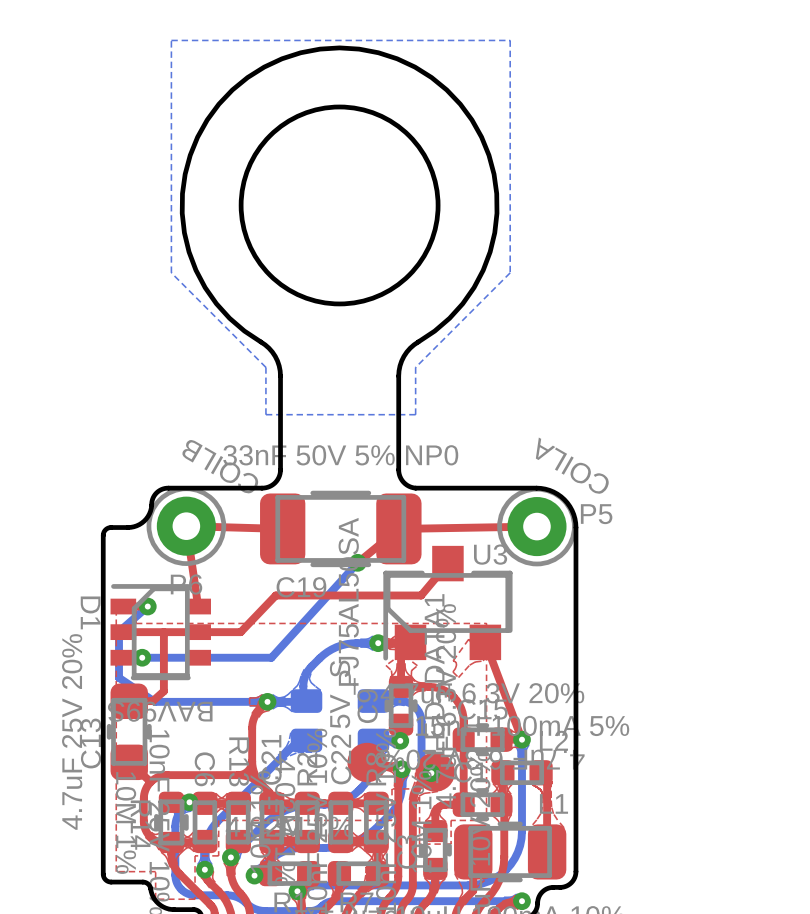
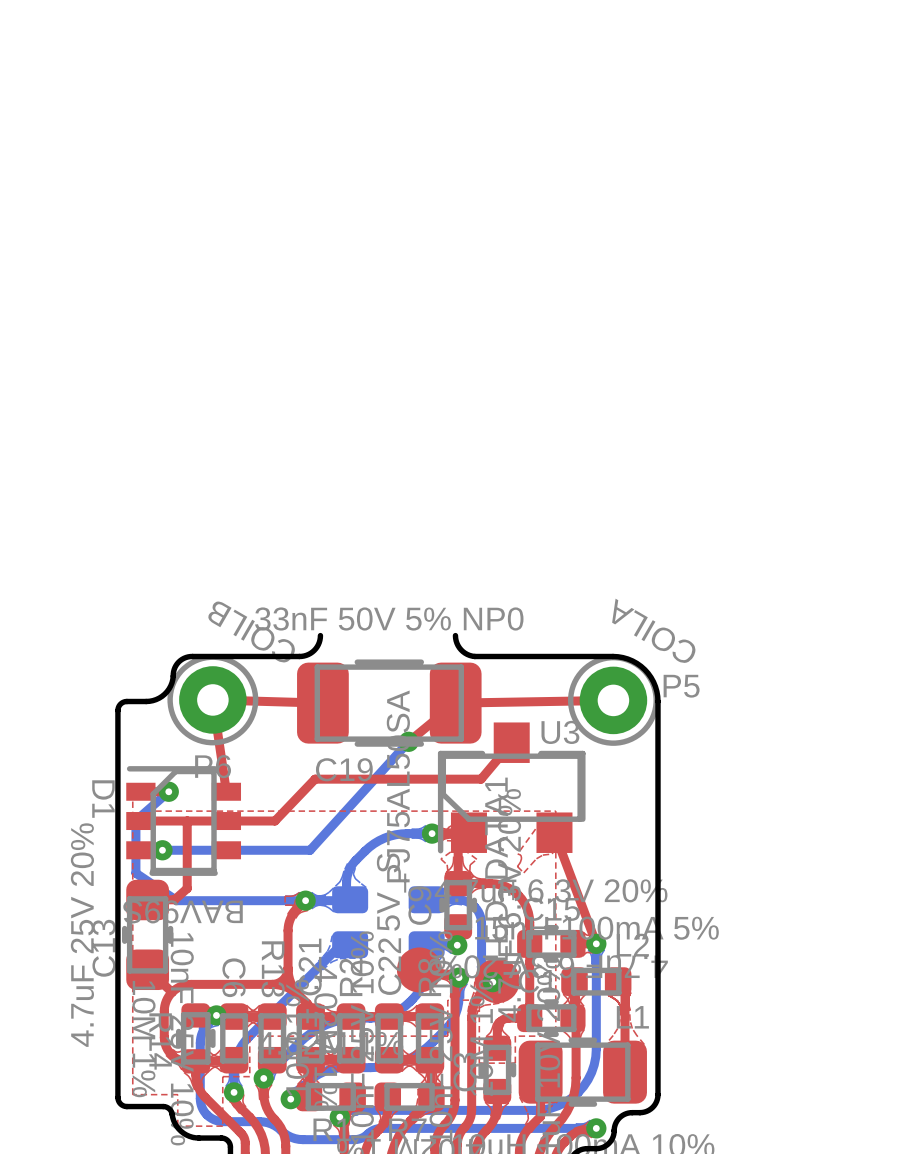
bottom zone outline: (171, 40) (171, 272) (265, 367) (265, 414) (415, 414) (415, 367) (510, 272) (510, 40) (171, 40) -> none
round board edge: [238, 104, 441, 307] -> none
board edge: (280, 469) (279, 365) (268, 348) (244, 331) (216, 303) (195, 270) (184, 232) (182, 213) (185, 174) (190, 155) (207, 119) (232, 89) (264, 67) (282, 58) (300, 52) (339, 47) (359, 49) (397, 58) (431, 77) (460, 104) (471, 119) (488, 155) (494, 174) (496, 213) (494, 232) (483, 270) (462, 303) (434, 331) (410, 348) (400, 365) (398, 469) -> none

